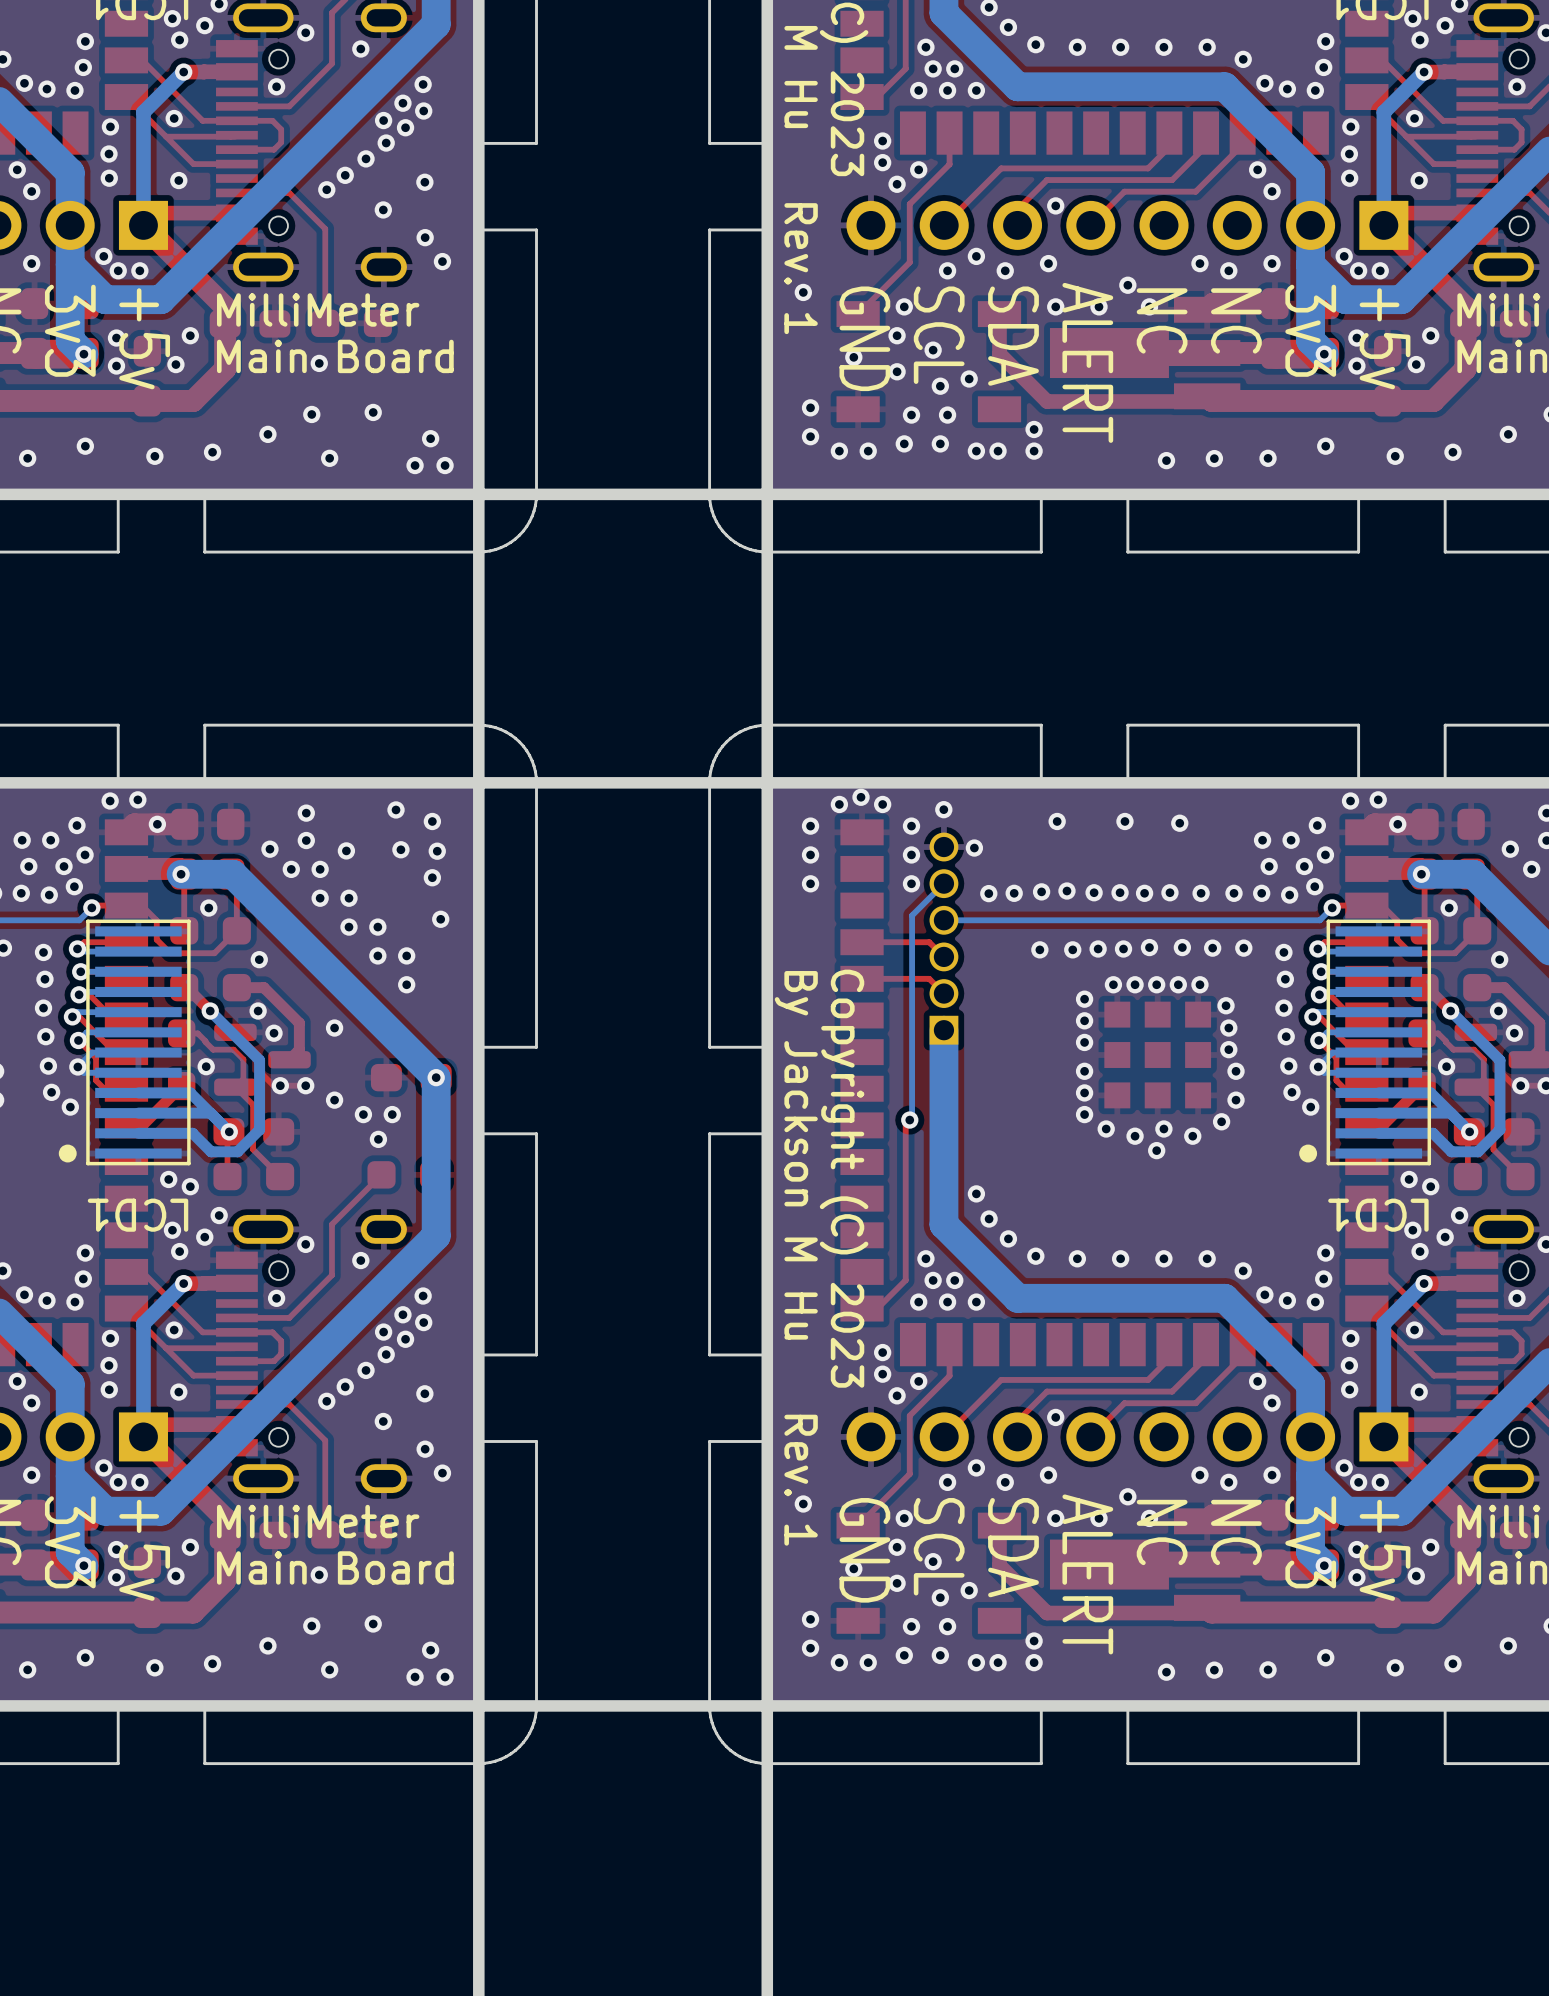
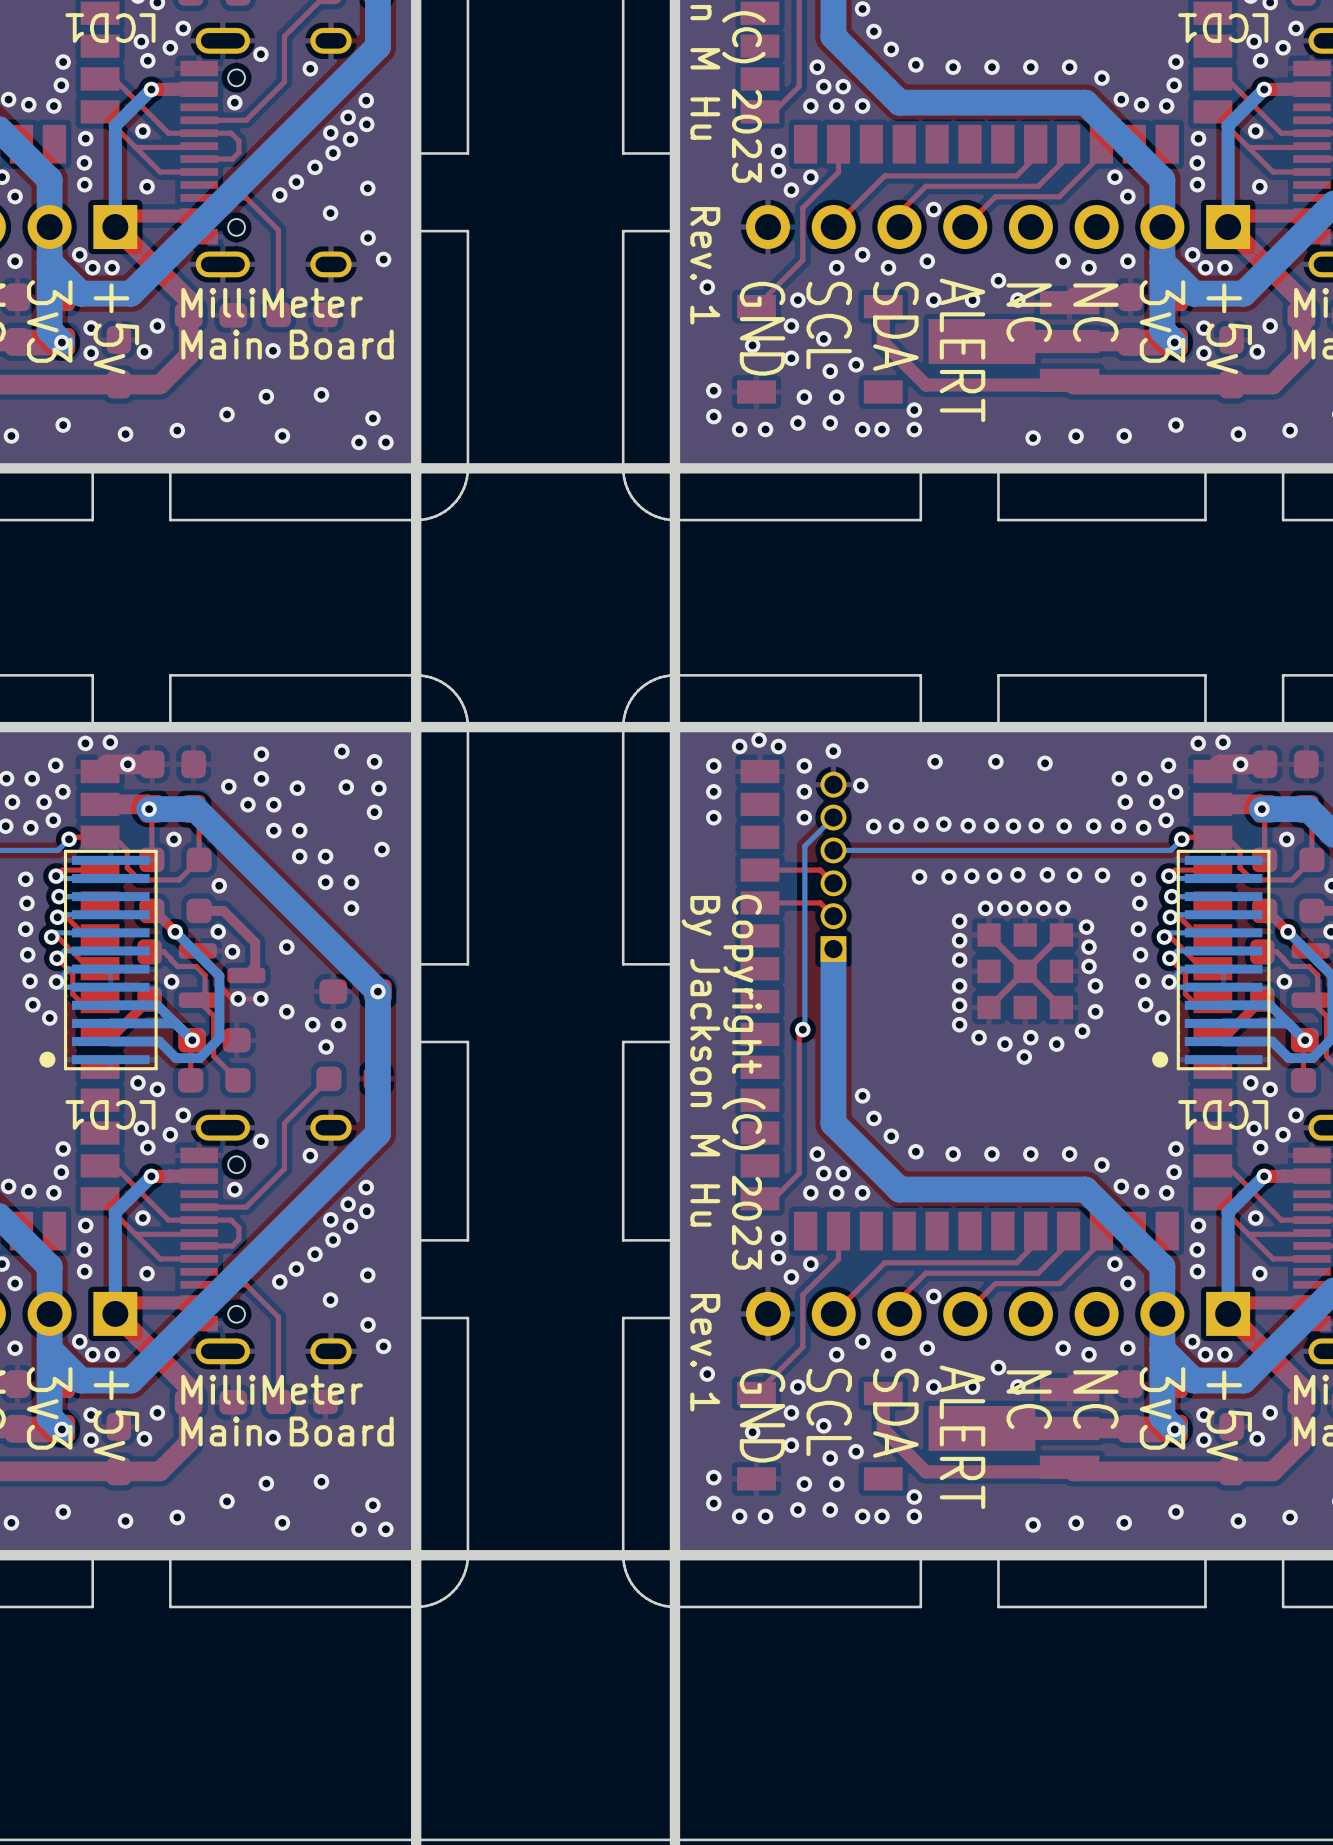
top track: none -> (989, 935) (1061, 1007)
top track: none -> (1061, 935) (989, 1007)

